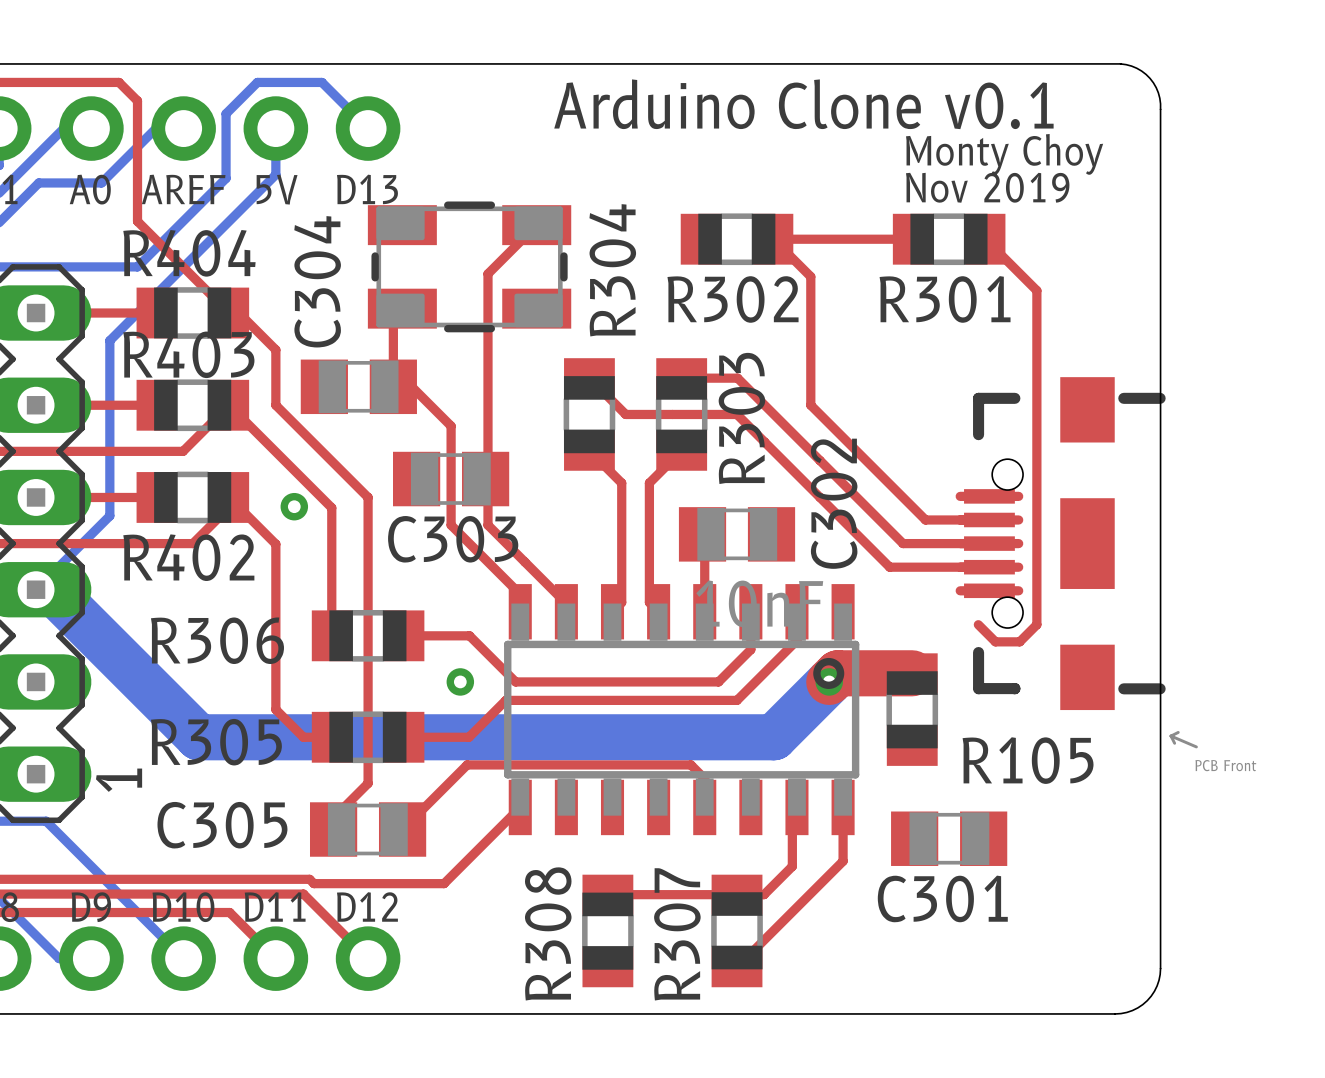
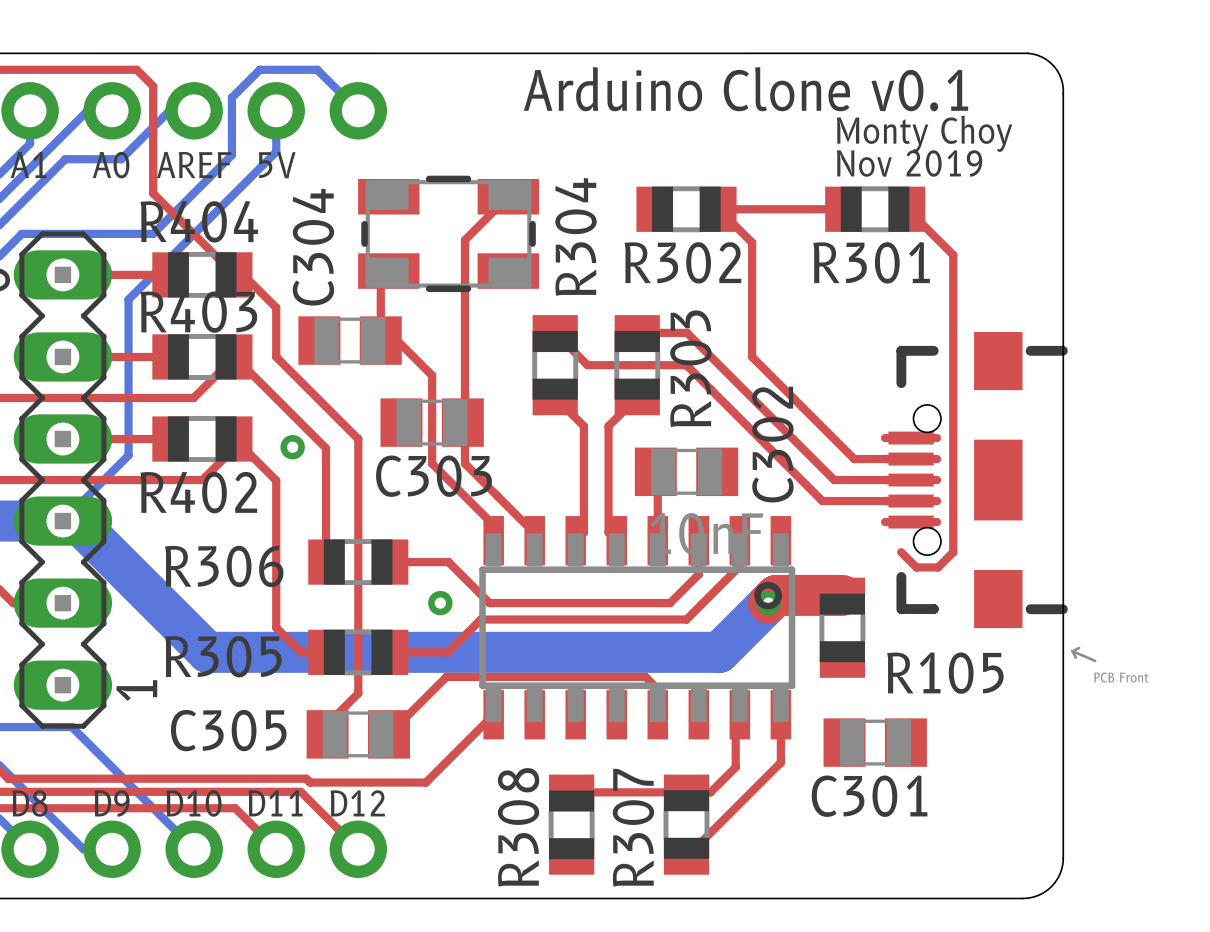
text: D13 (367, 189) -> none

